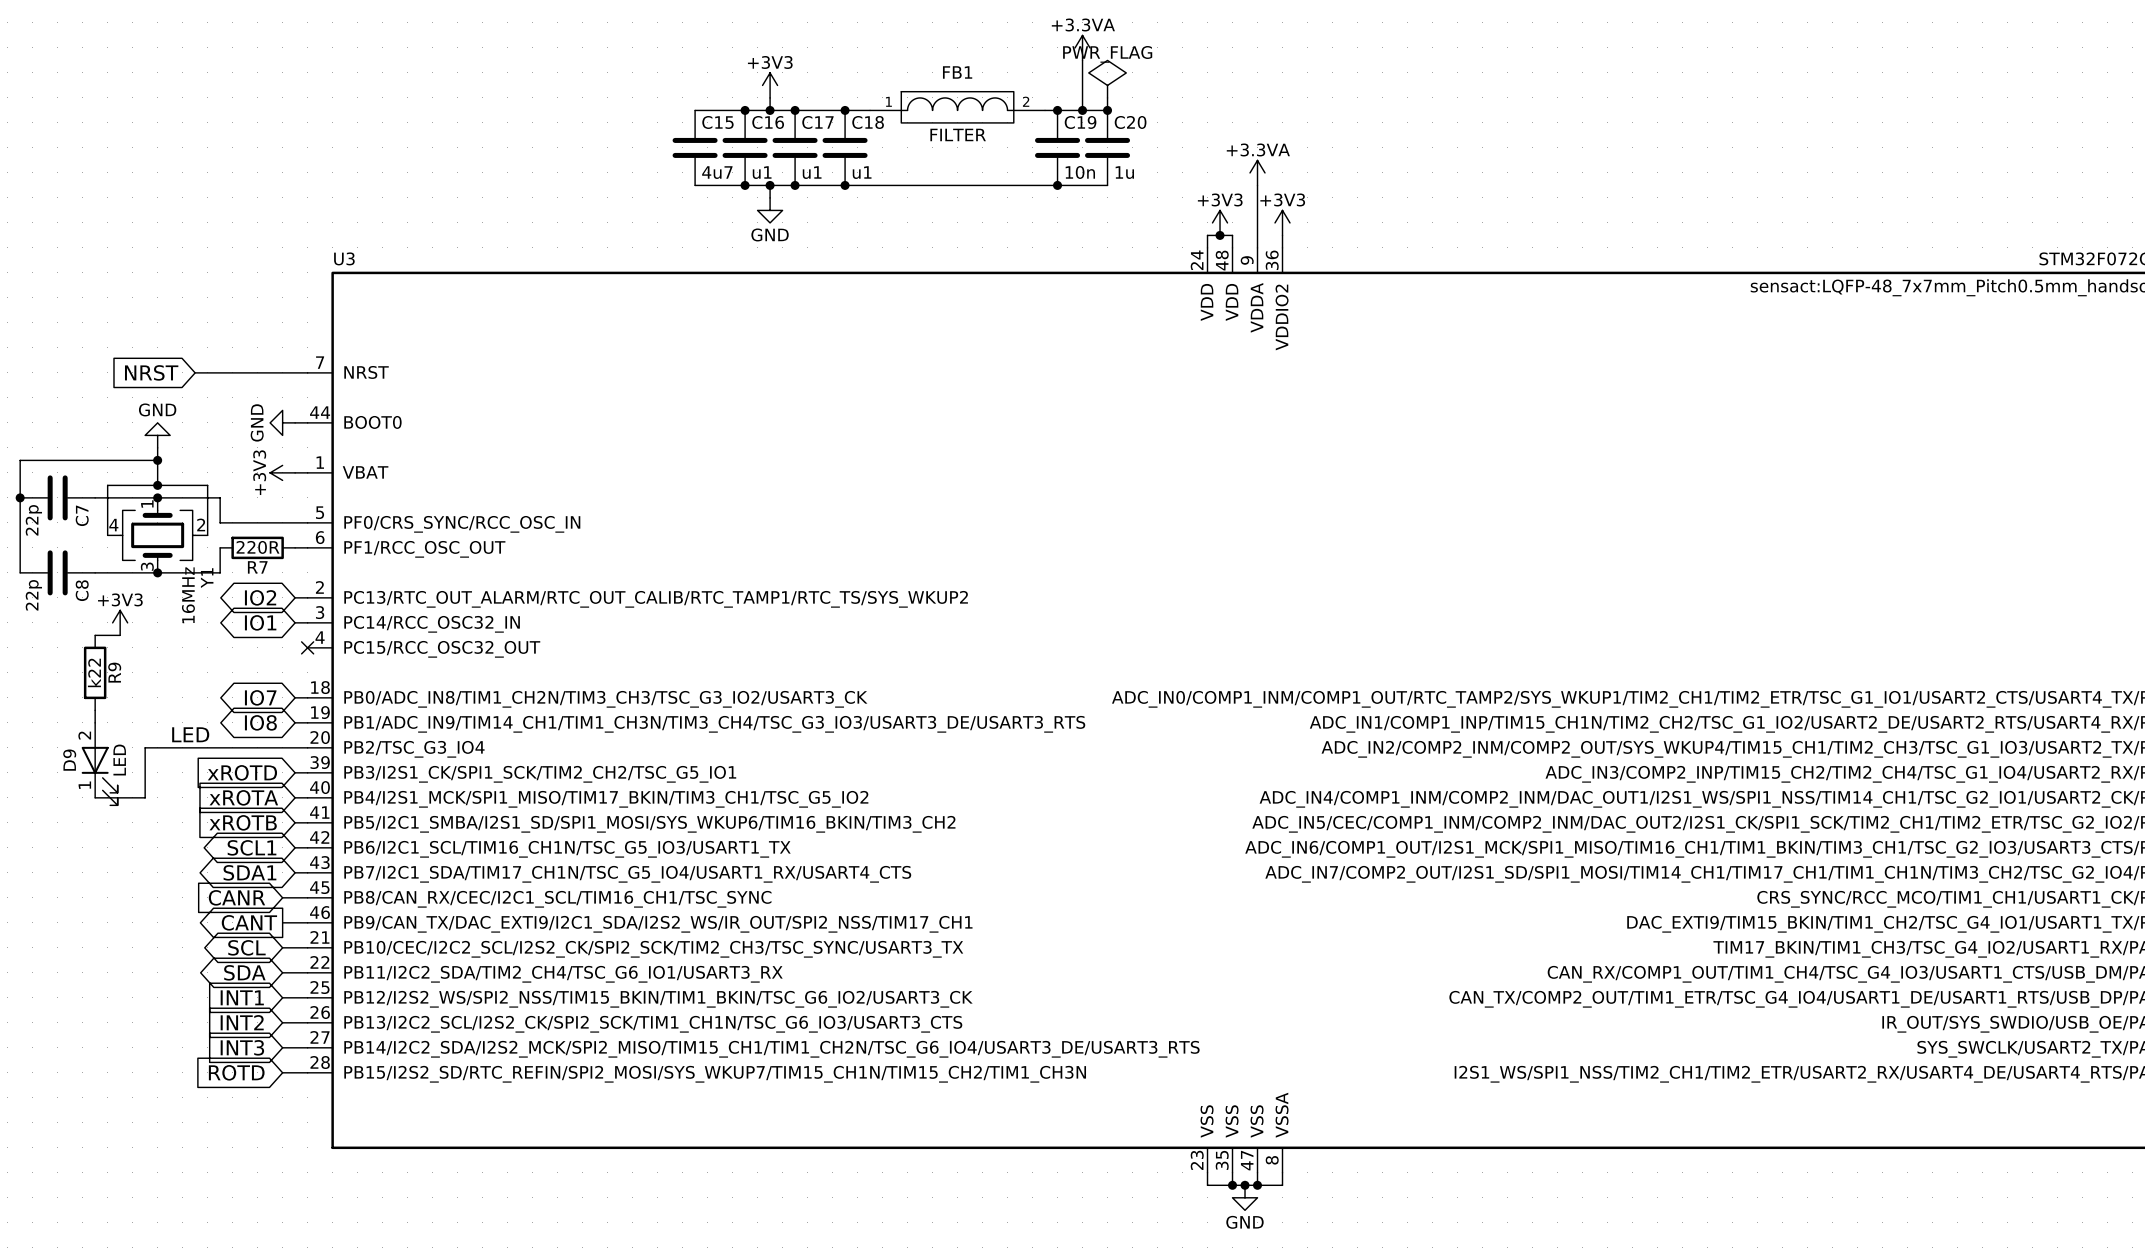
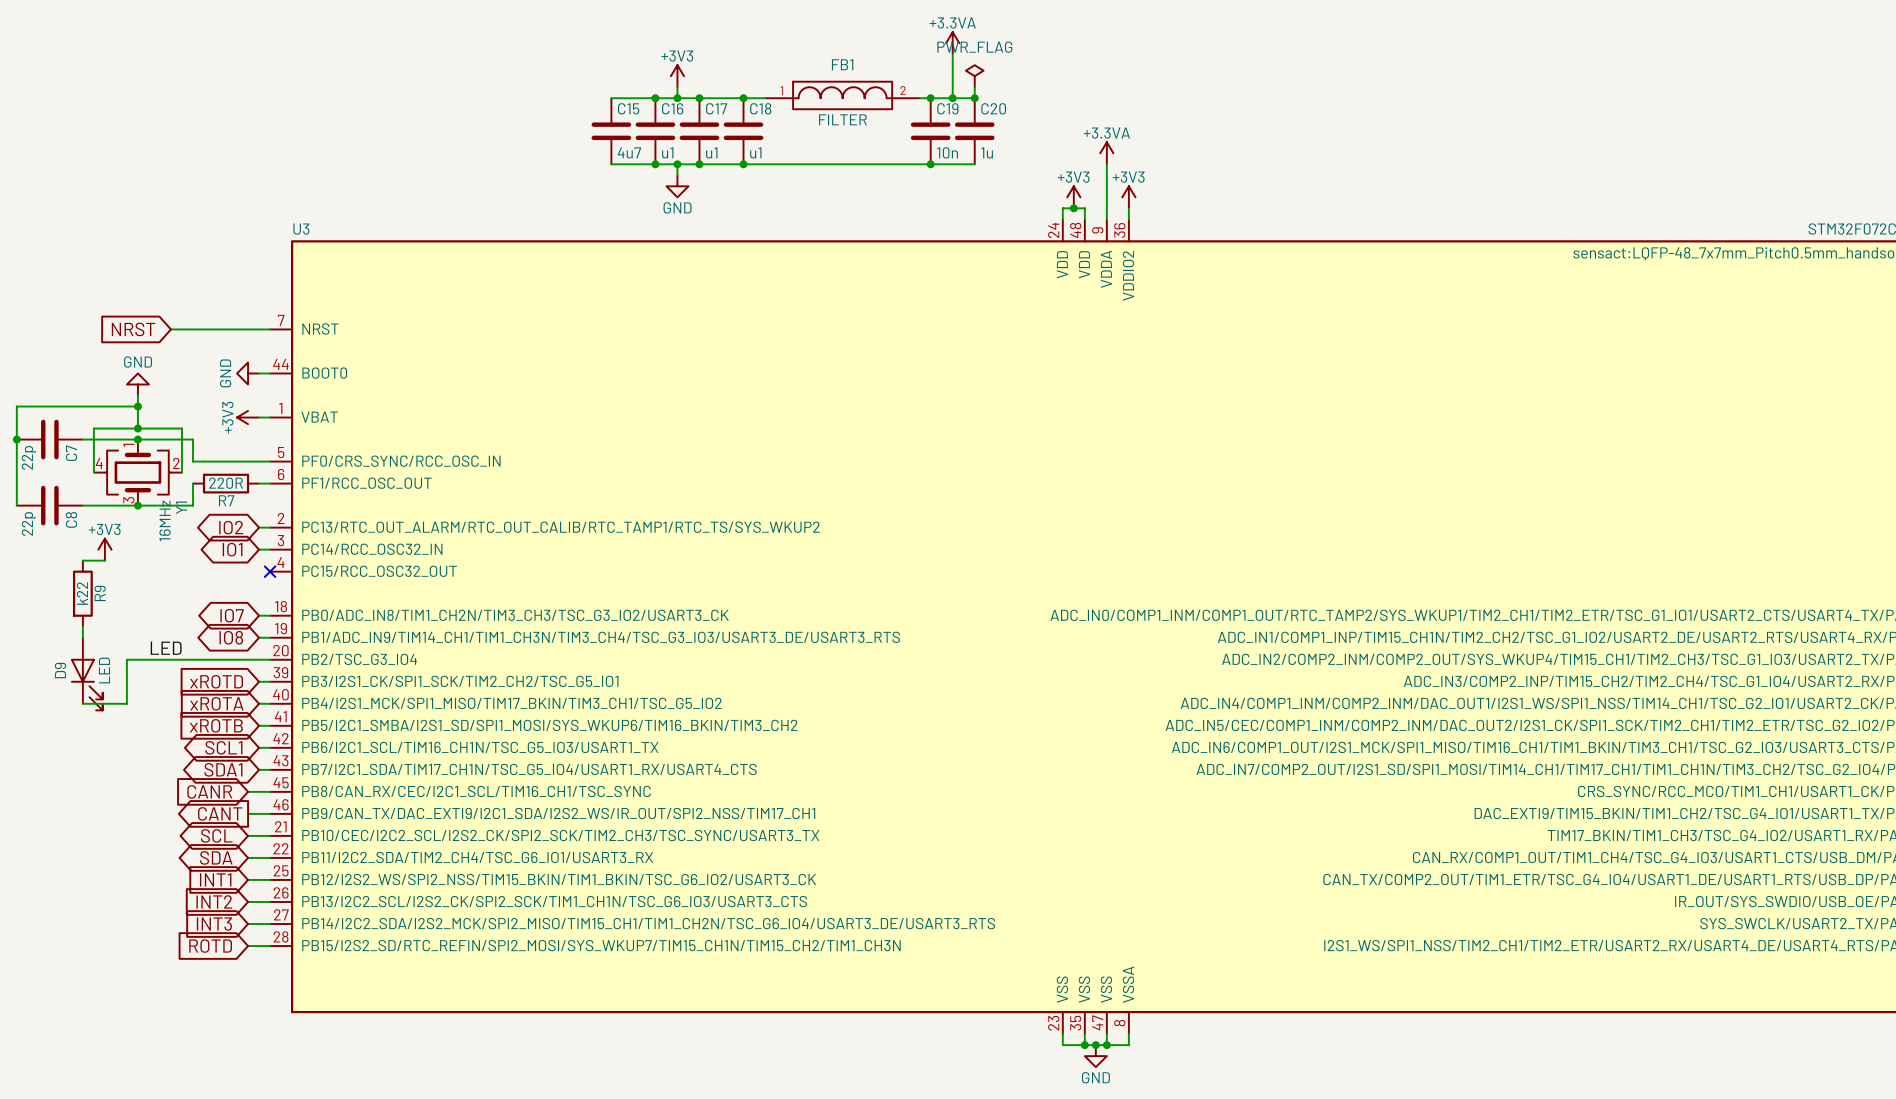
power symbol shape: [1088, 60, 1127, 98] -> [965, 65, 984, 88]
D9 pin number: 2 (84, 735) -> none
D9 pin number: 1 (84, 785) -> none

